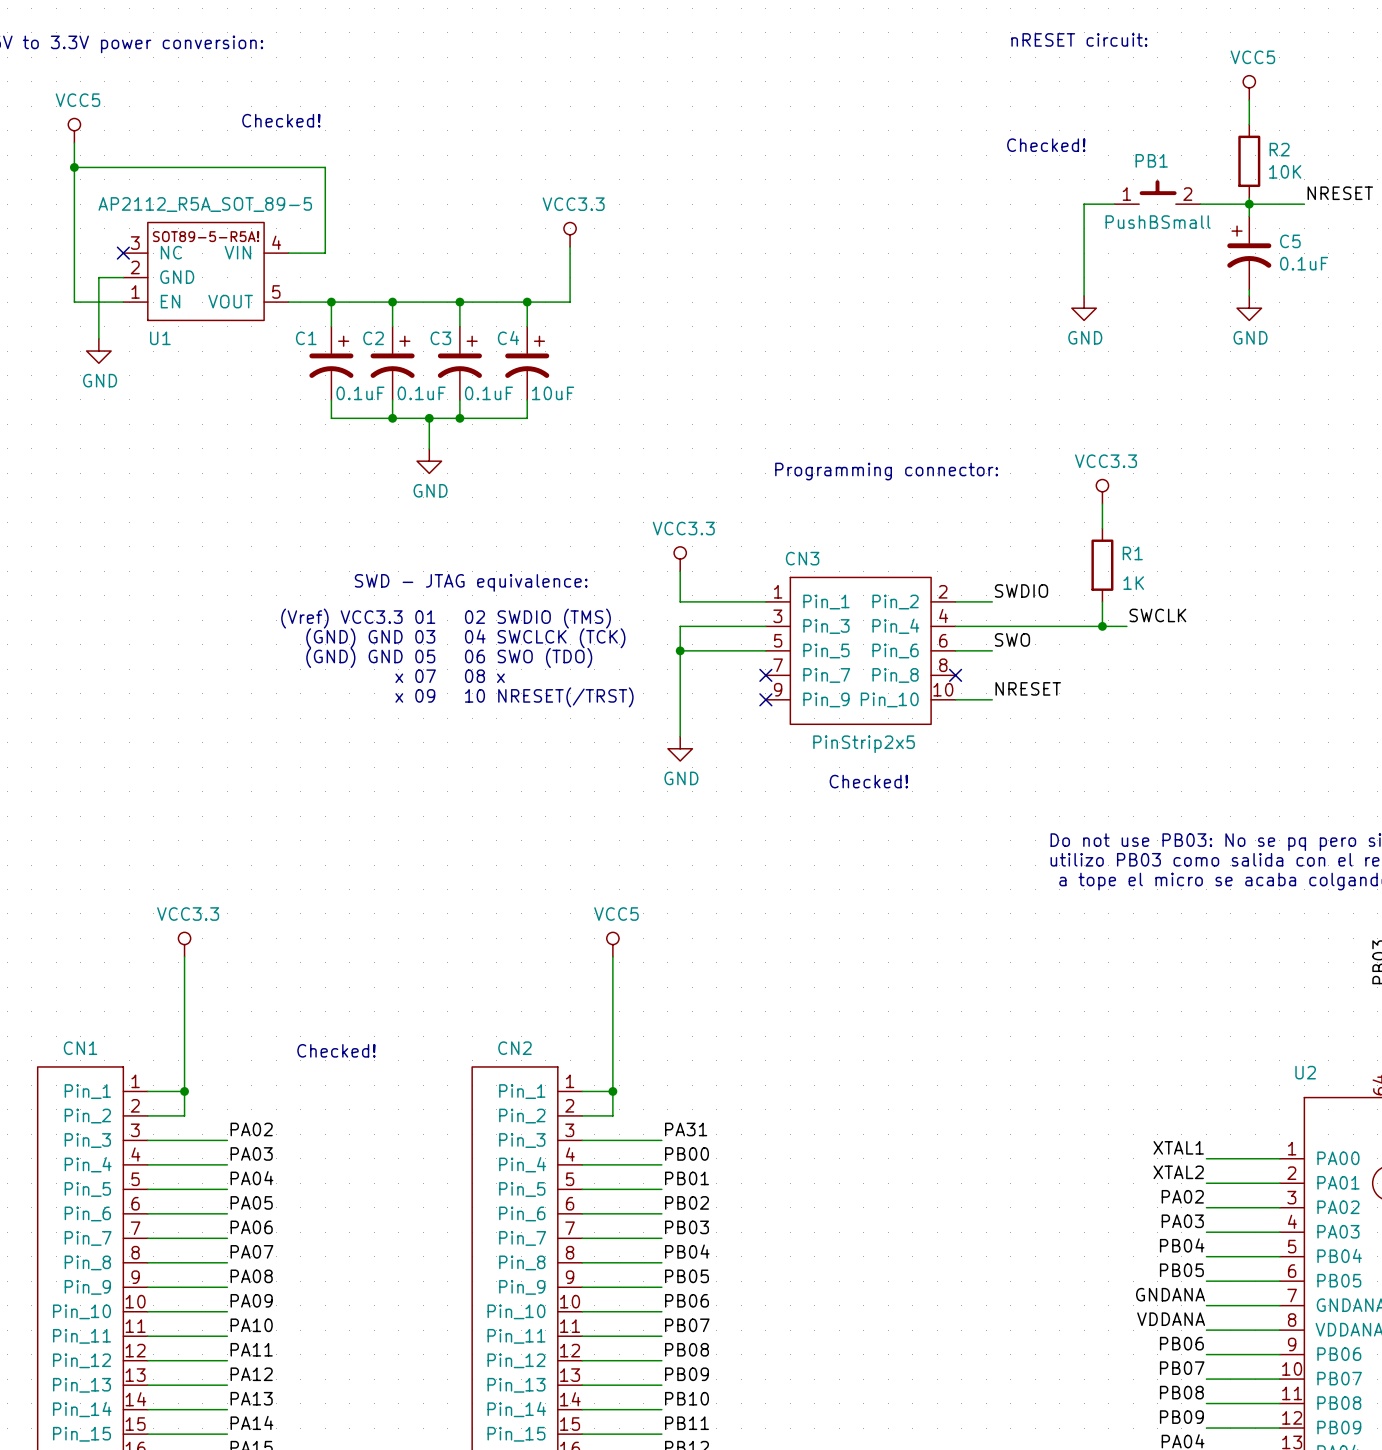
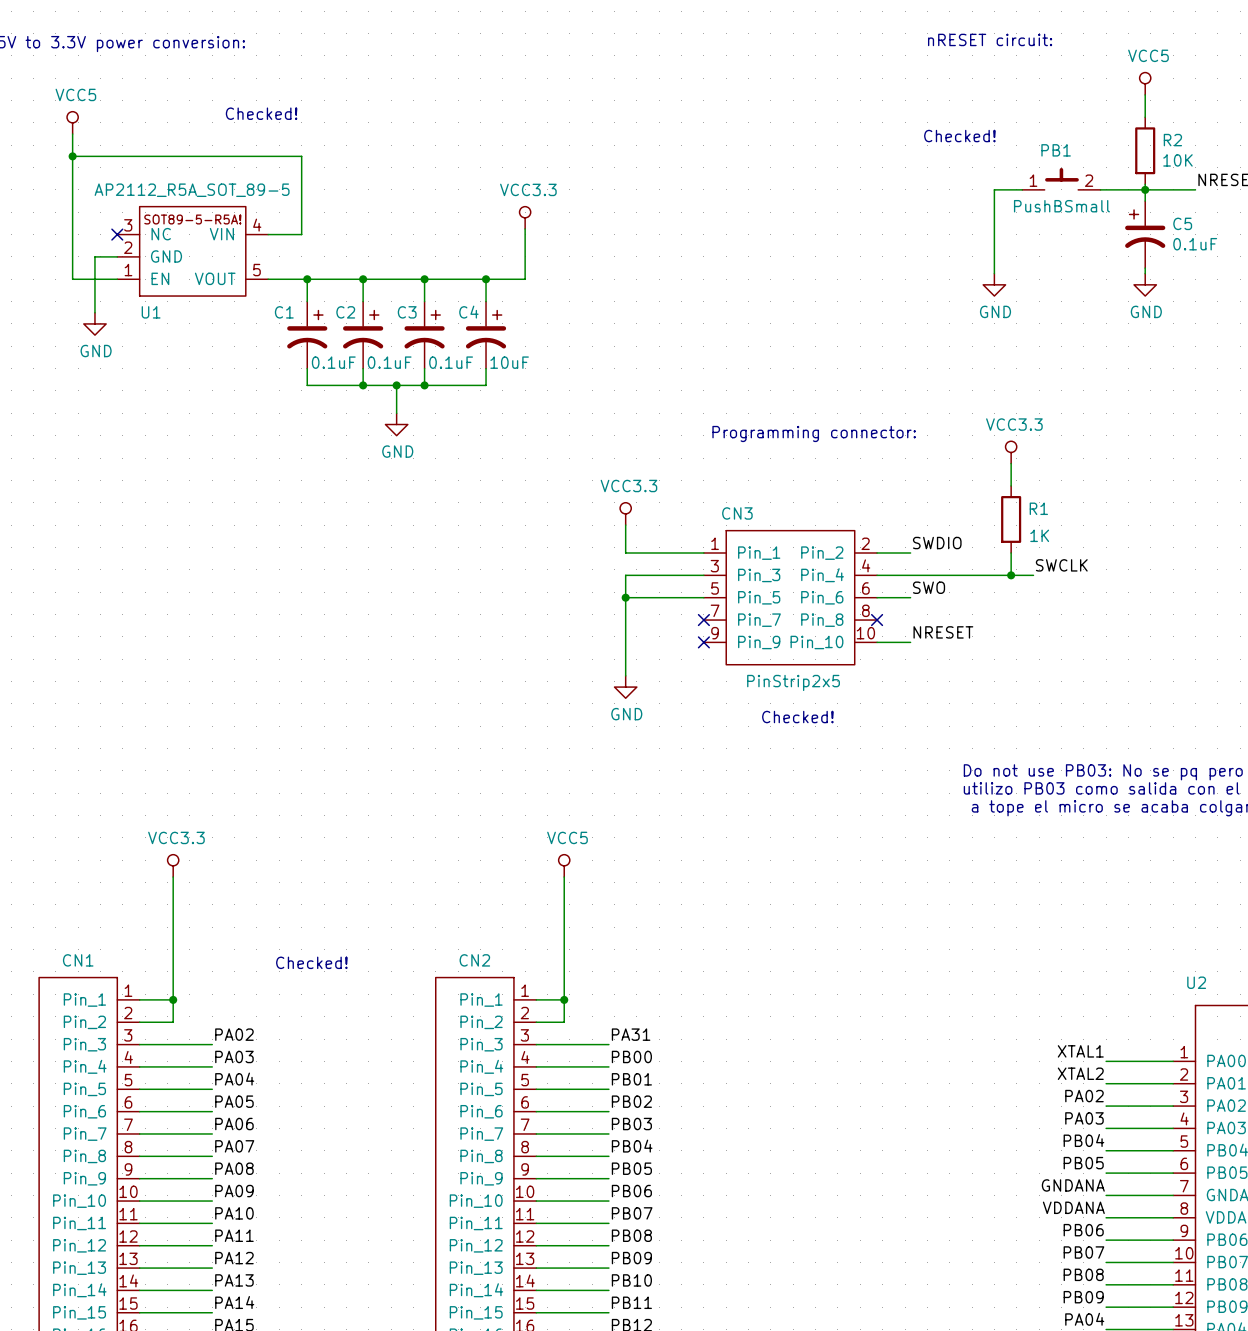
text: SWD - JTAG equivalence: (471, 582) -> none
text: (Vref) VCC3.3 01 (358, 618) -> none
text: 02 SWDIO (TMS) (537, 618) -> none
text: (GND) GND 03 (370, 638) -> none
text: 04 SWCLCK (TCK) (545, 638) -> none
text: (GND) GND 05 (370, 657) -> none
text: 06 SWO (TDO) (528, 657) -> none
text: x 07 (415, 676) -> none
text: 08 x (484, 676) -> none
text: x 09 (415, 695) -> none
text: 10 NRESET(/TRST) (549, 697) -> none

